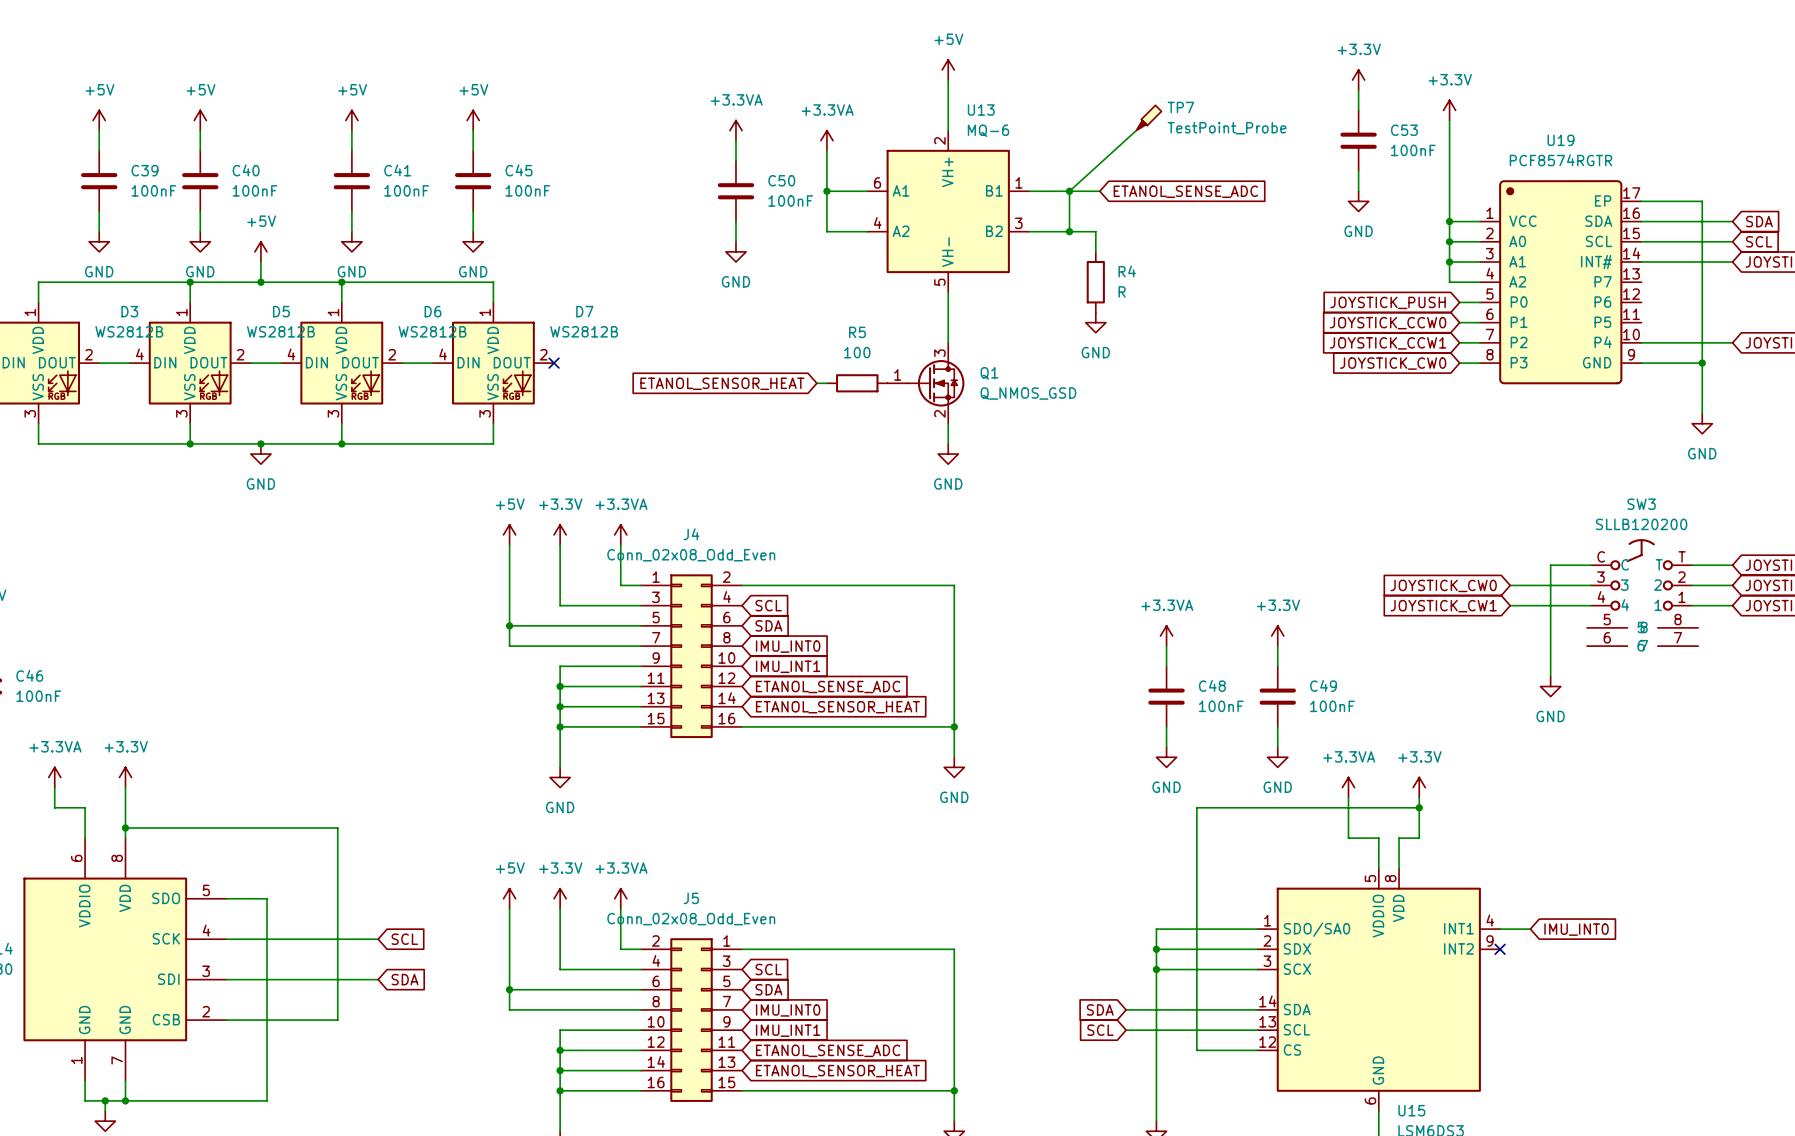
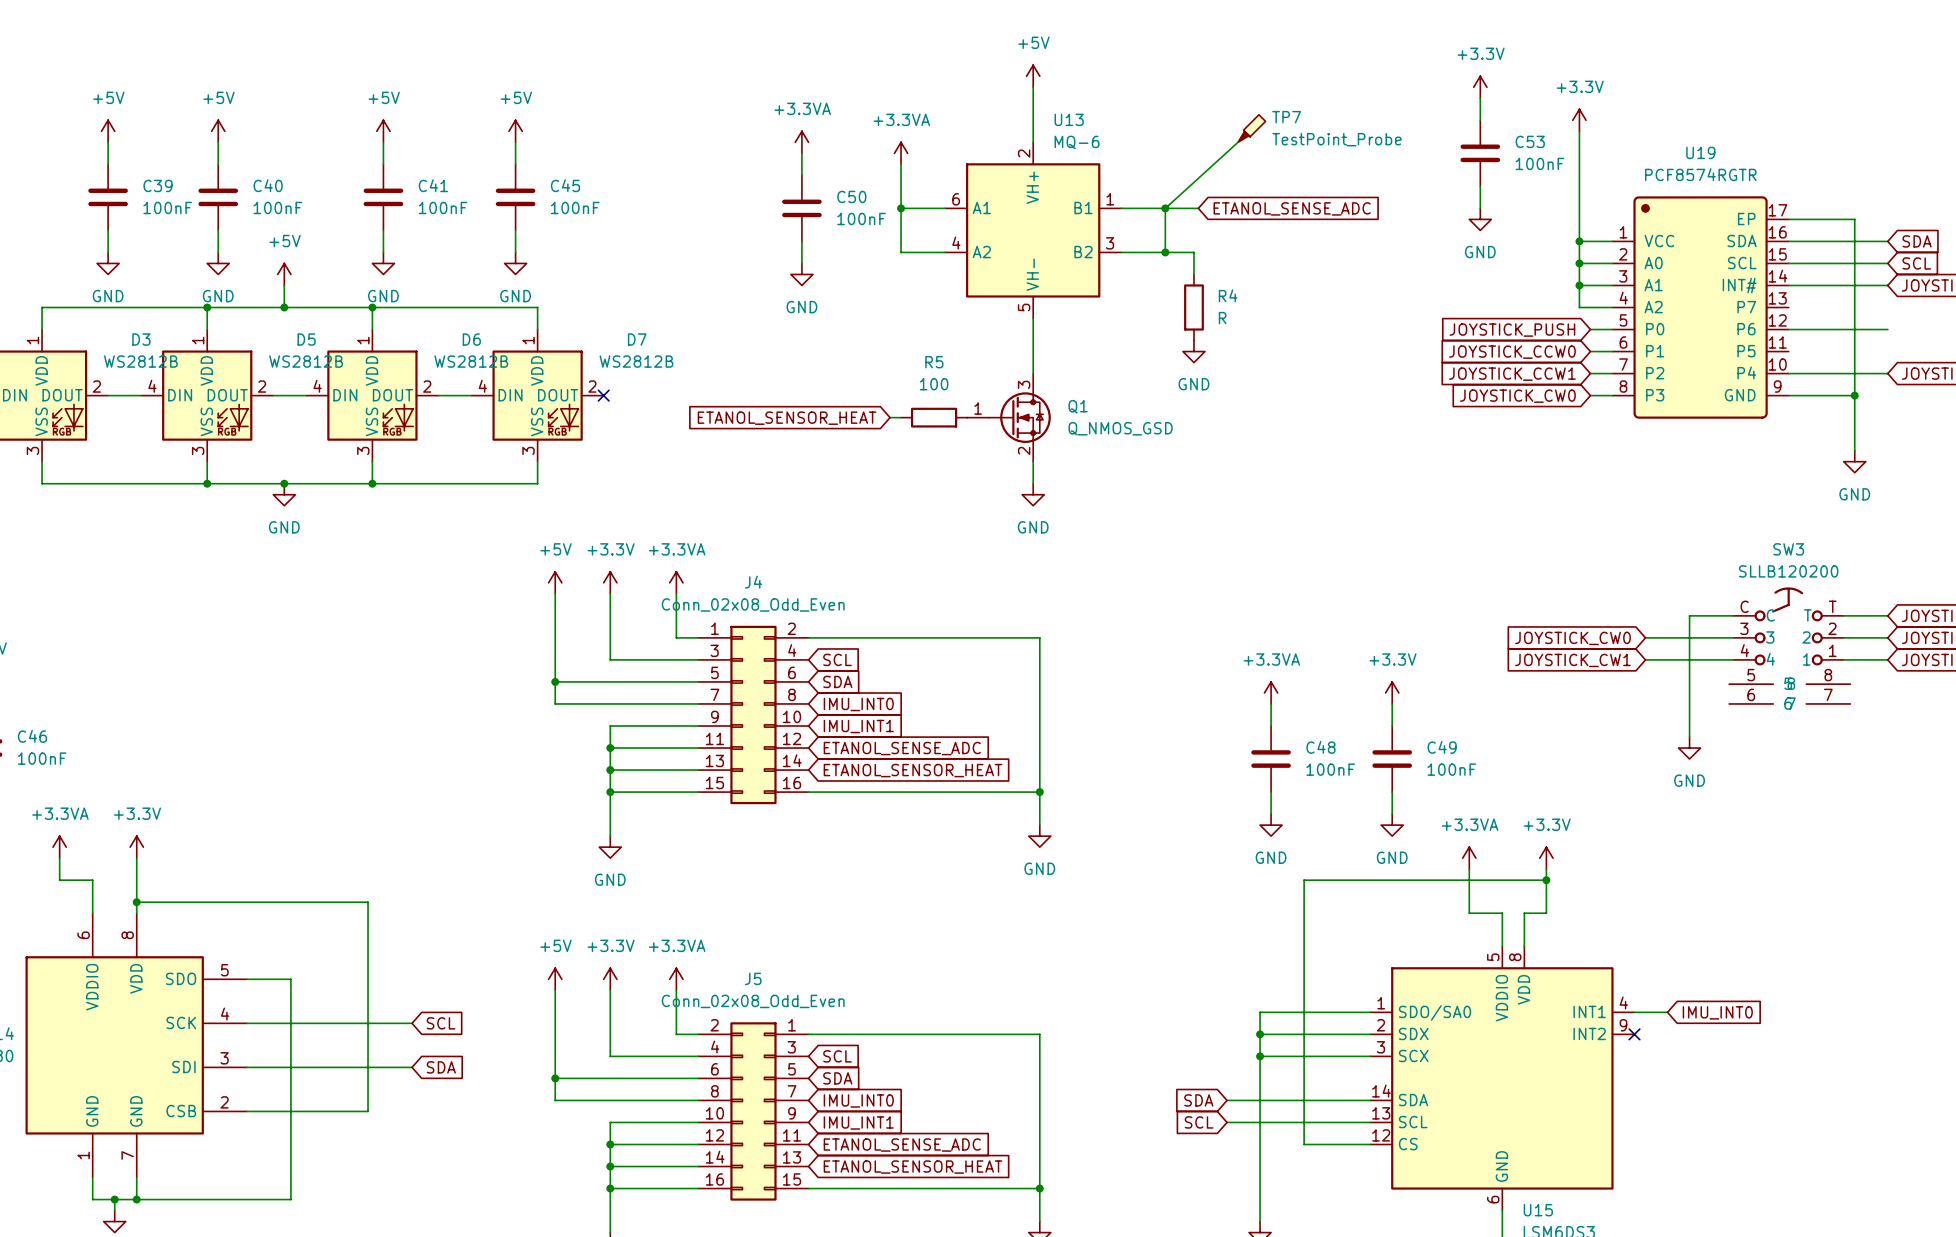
wire: none -> (1788, 329) (1887, 329)

